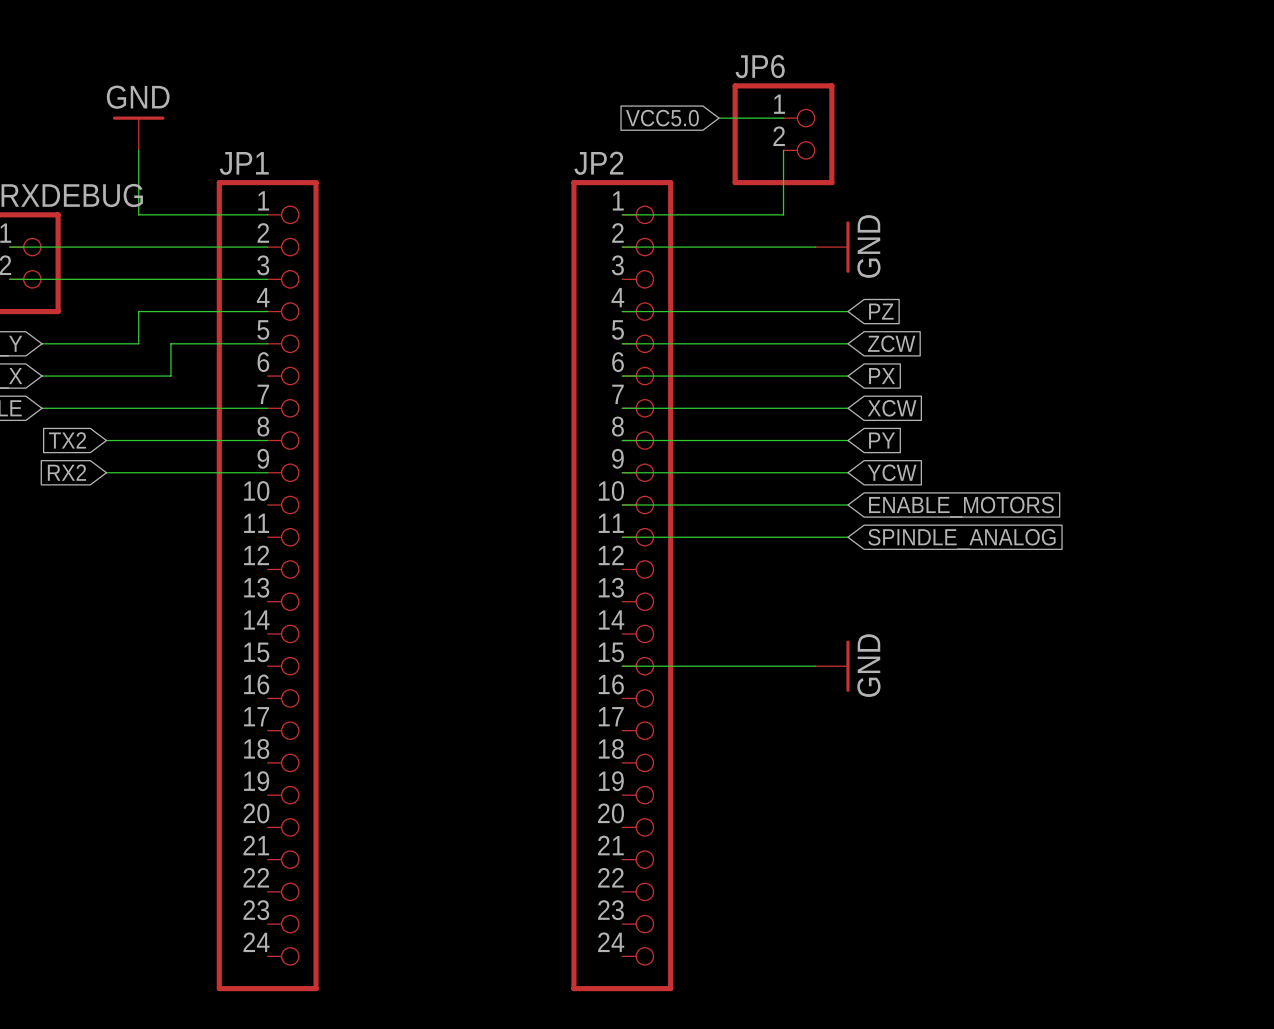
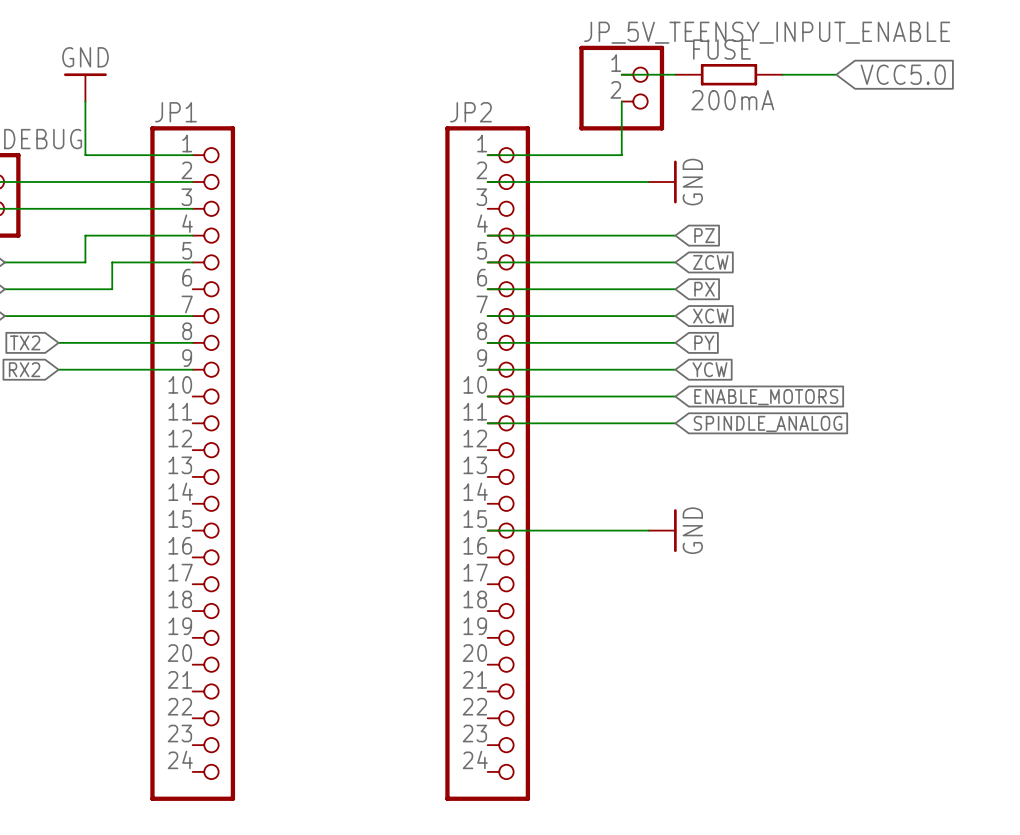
JP6 name: JP6 (760, 66) -> JP_5V_TEENSY_INPUT_ENABLE (767, 32)
global label: VCC5.0 (662, 118) -> none
wire: (719, 118) (783, 118) -> (675, 74) (621, 74)
FUSE: none -> 200mA (729, 74)
wire: none -> (782, 74) (836, 74)
global label: none -> VCC5.0 (903, 74)

